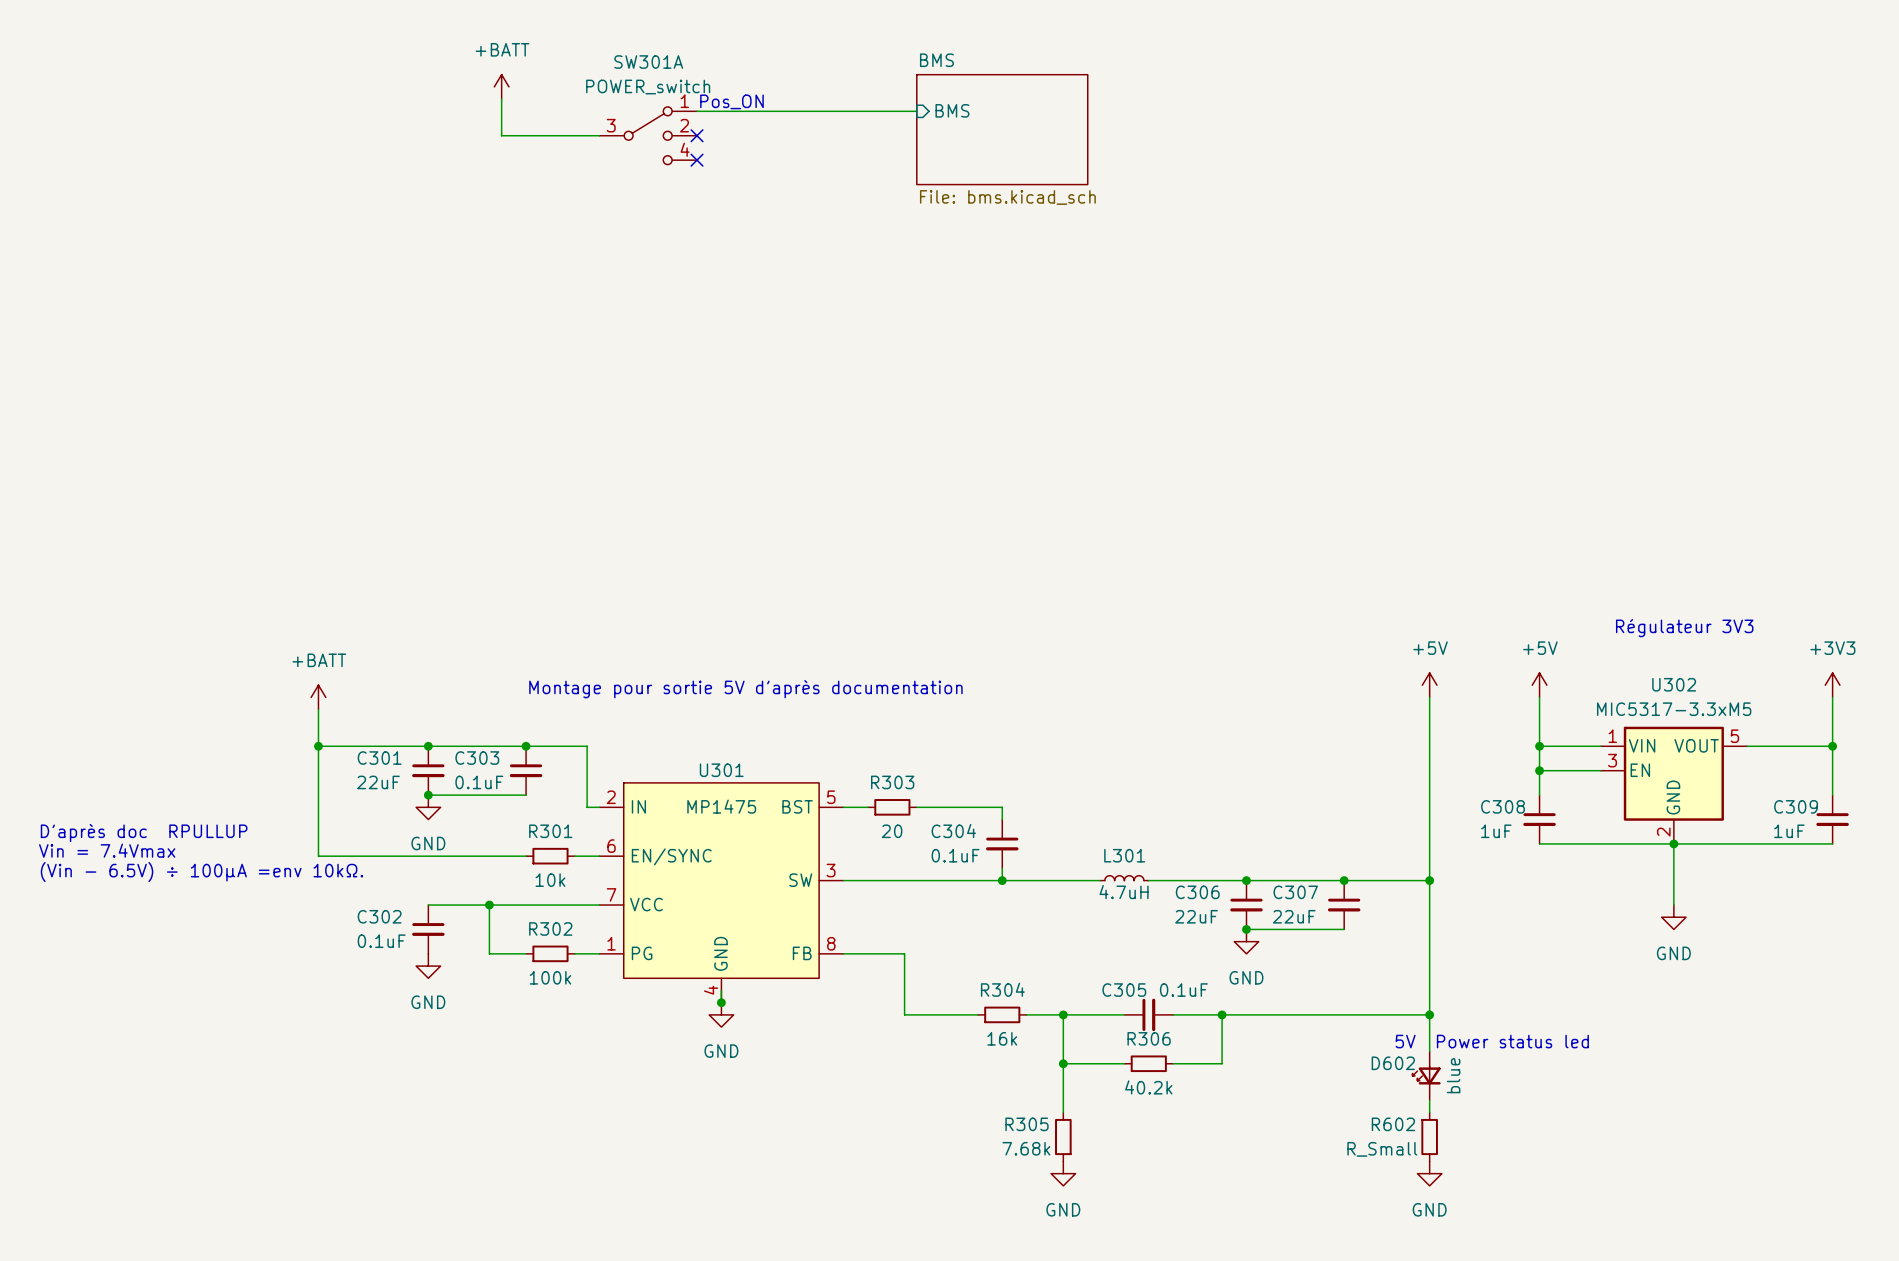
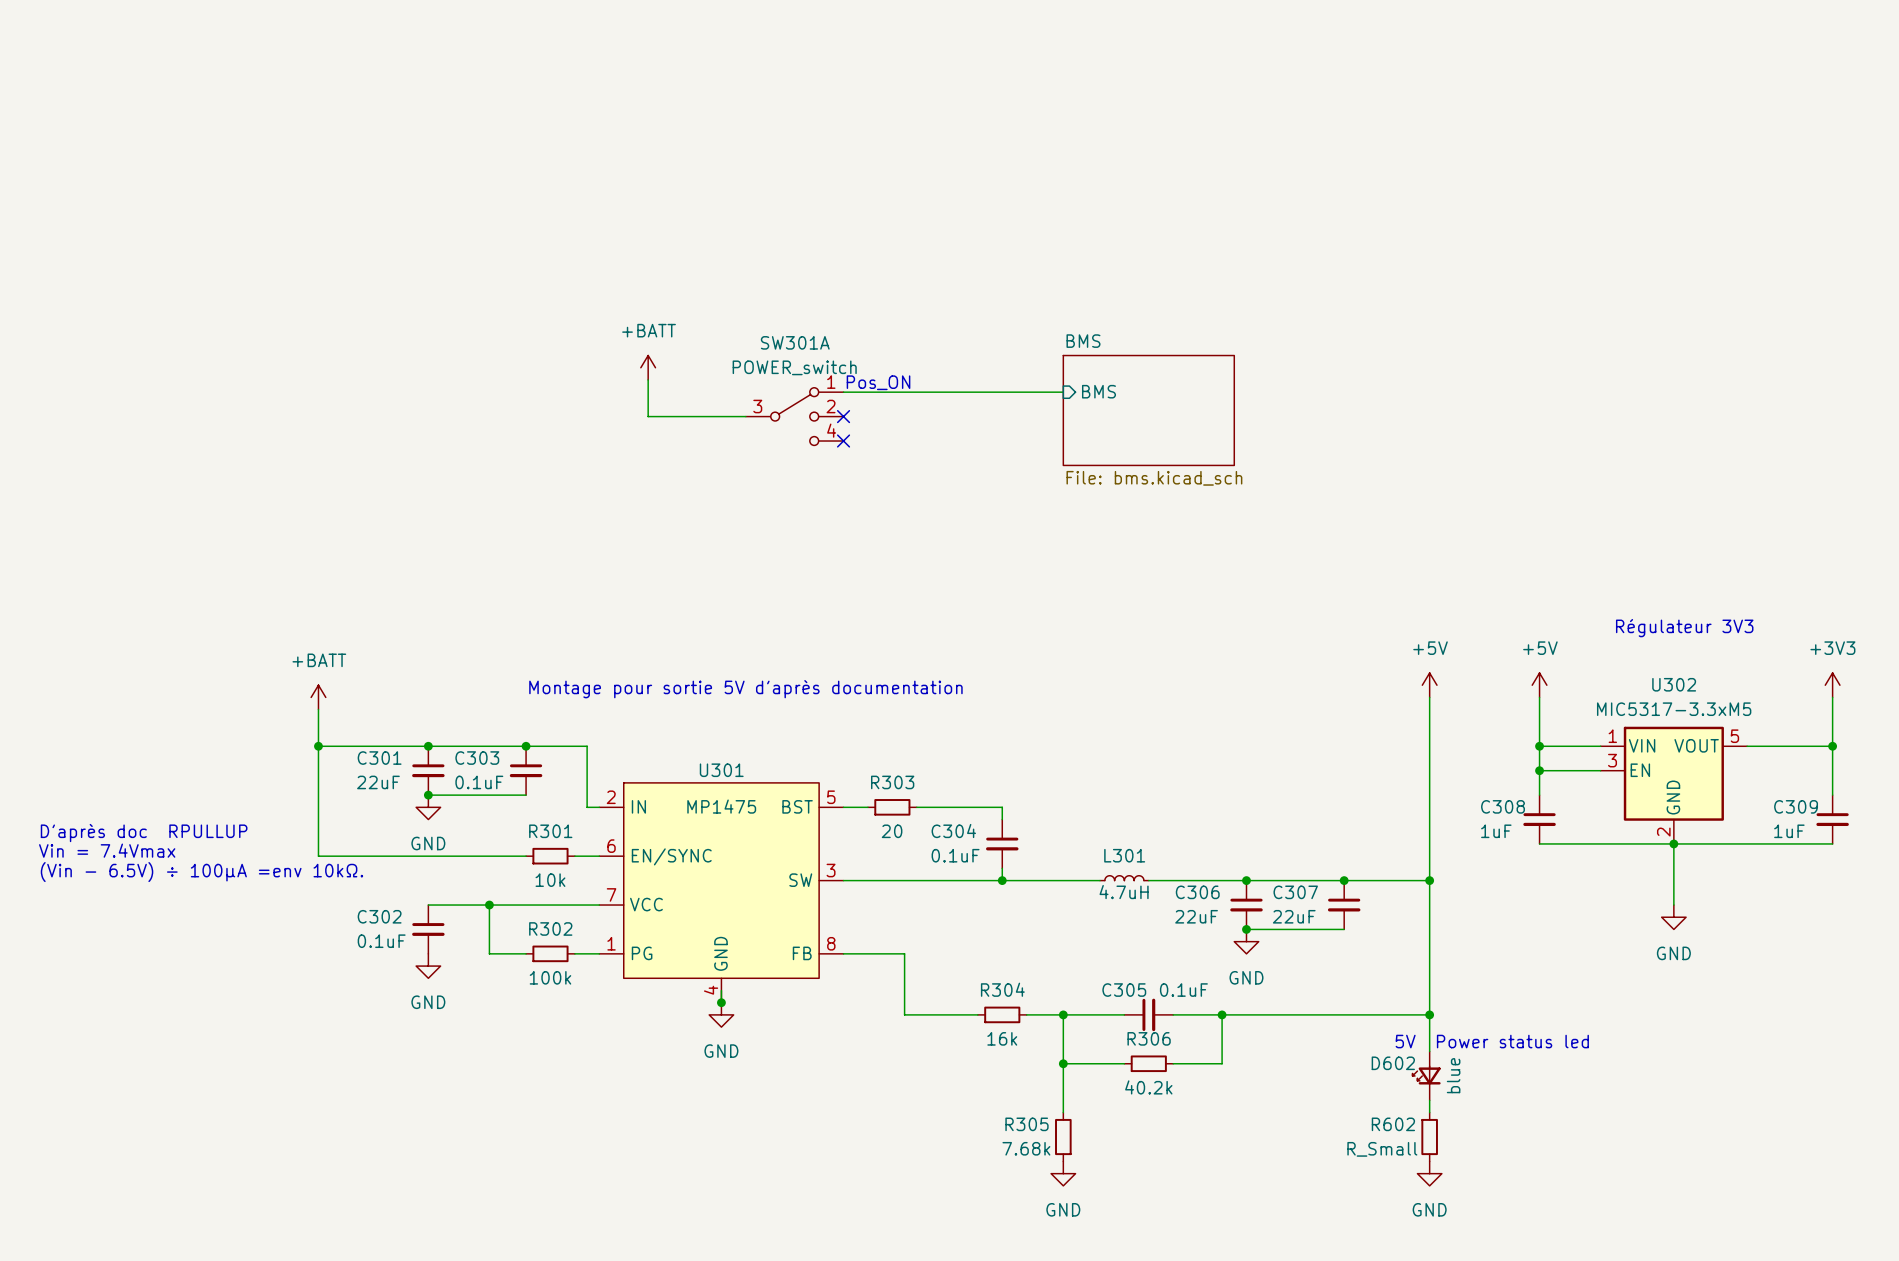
power symbol: +BATT (501, 86) -> none
wire: (501, 99) (501, 135) (599, 135) -> none
text: Pos_ON (731, 101) -> none
sheet pin: BMS (952, 110) -> none
wire: (697, 111) (916, 111) -> none
sheet BMS: File: bms.kicad_sch (1002, 129) -> none
SW301A position: (648, 135) -> (794, 416)
no-connect mark: (697, 135) -> none
no-connect mark: (697, 160) -> none
power symbol: none -> +BATT (648, 367)
wire: none -> (648, 379) (648, 416) (745, 416)
text: none -> Pos_ON (878, 382)
sheet pin: none -> BMS (1098, 391)
wire: none -> (843, 392) (1063, 392)
sheet BMS: none -> File: bms.kicad_sch (1148, 410)
no-connect mark: none -> (843, 416)
no-connect mark: none -> (843, 441)

